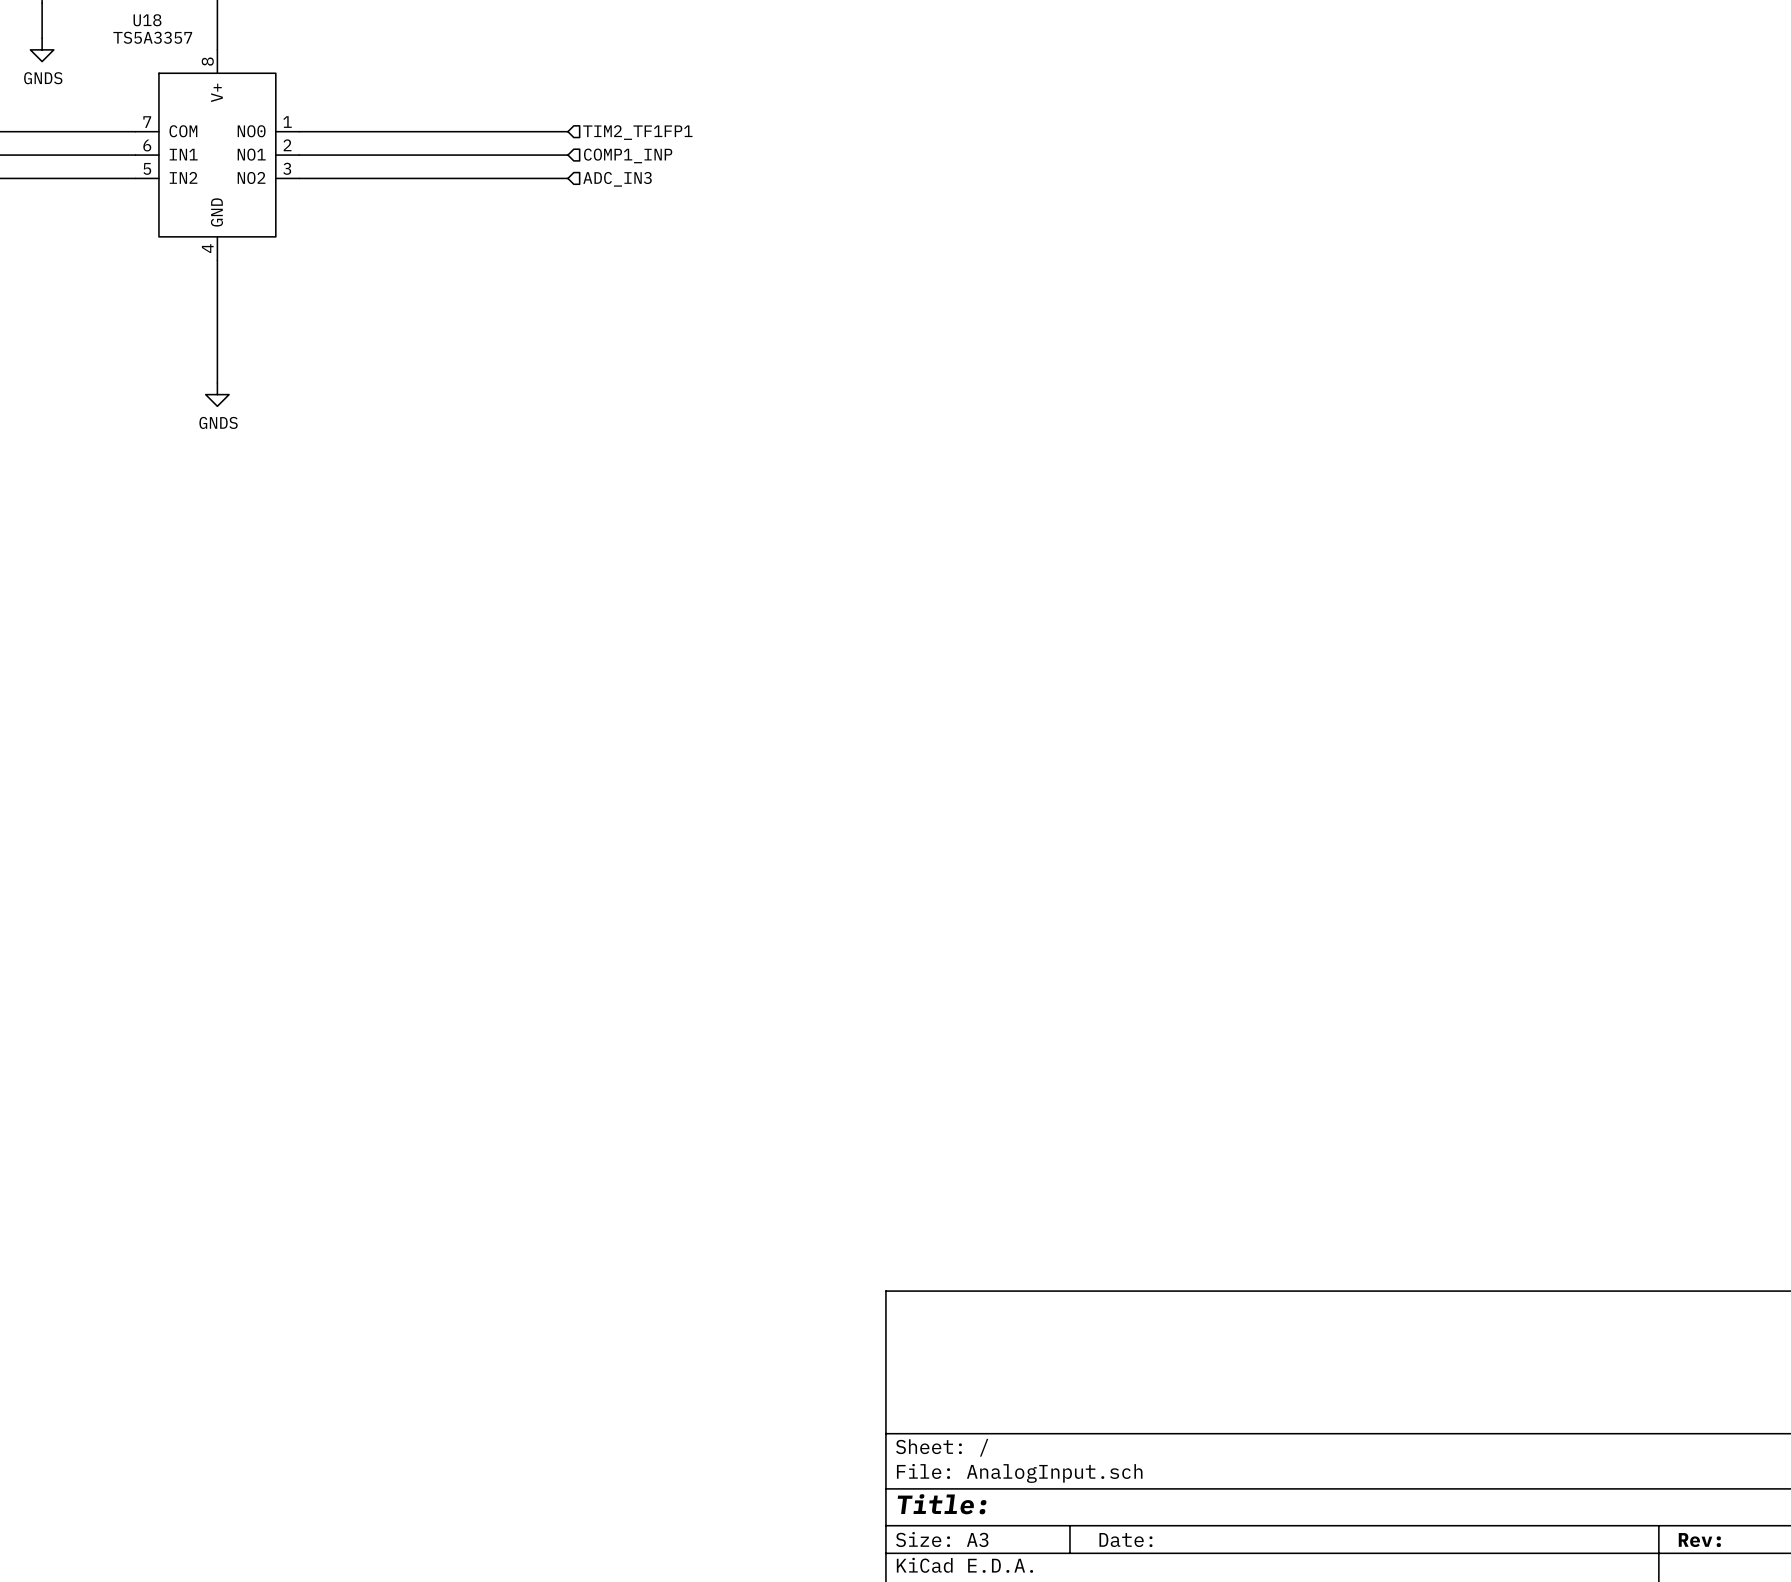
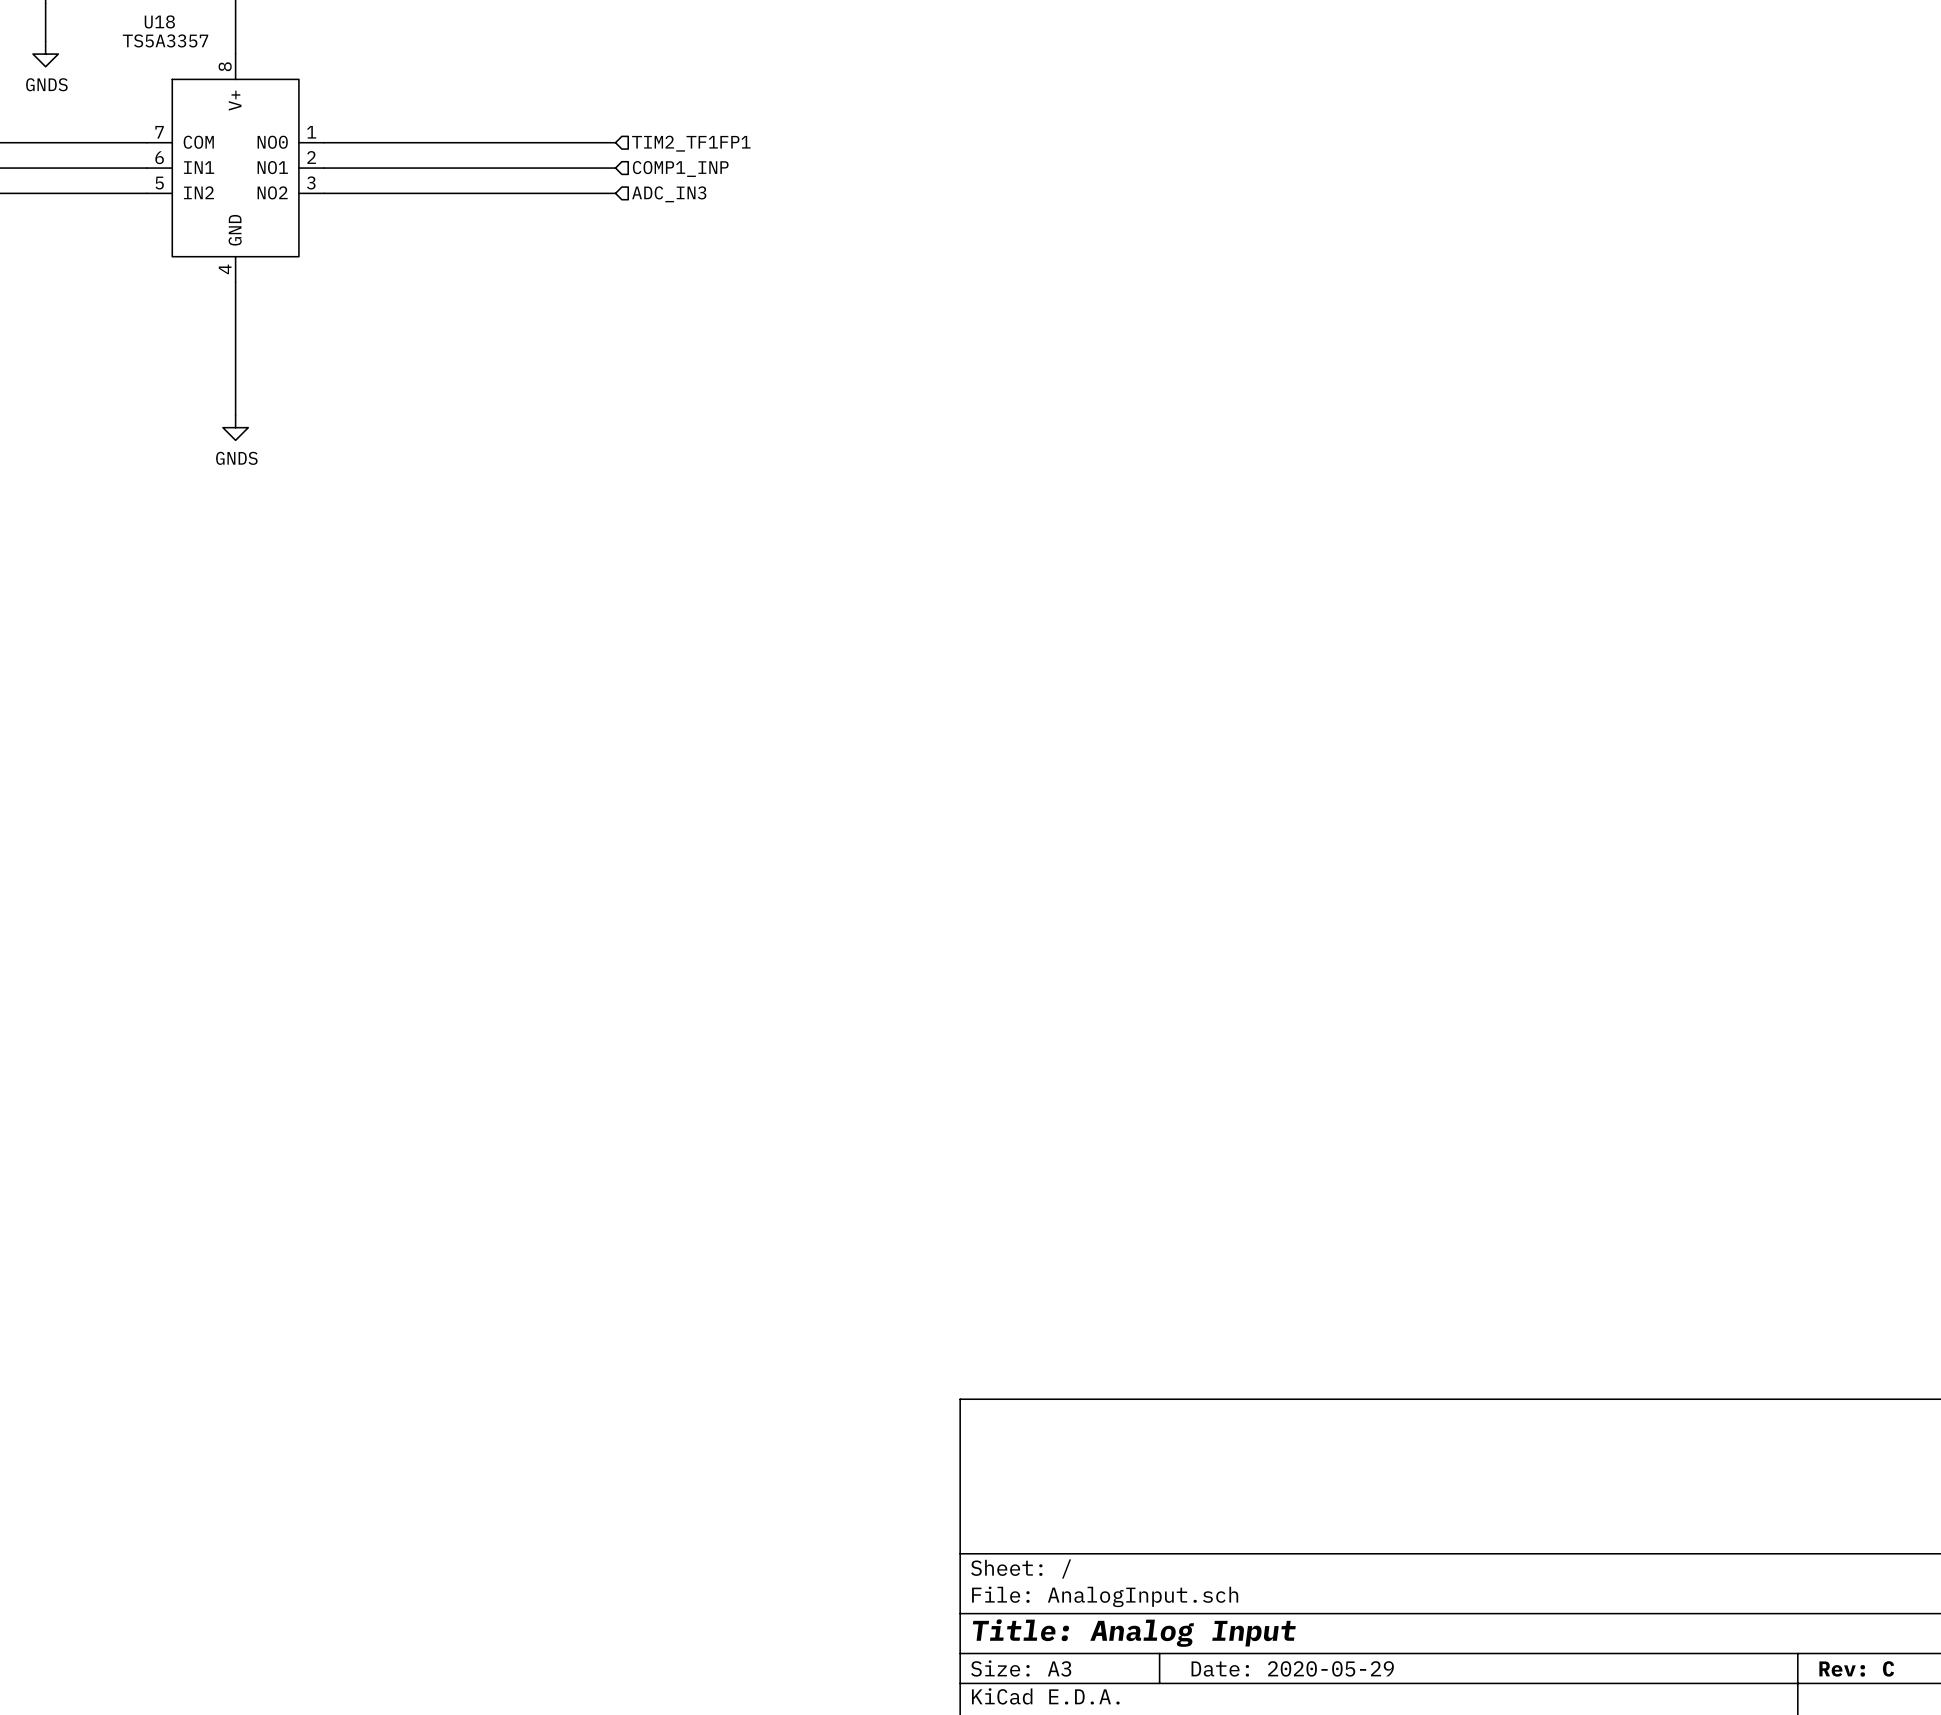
title block: Title: (942, 1504) -> Title: Analog Input (1134, 1633)
title block: Date: (1125, 1540) -> Date: 2020-05-29 (1292, 1668)
title block: Rev: (1699, 1540) -> Rev: C (1856, 1668)

